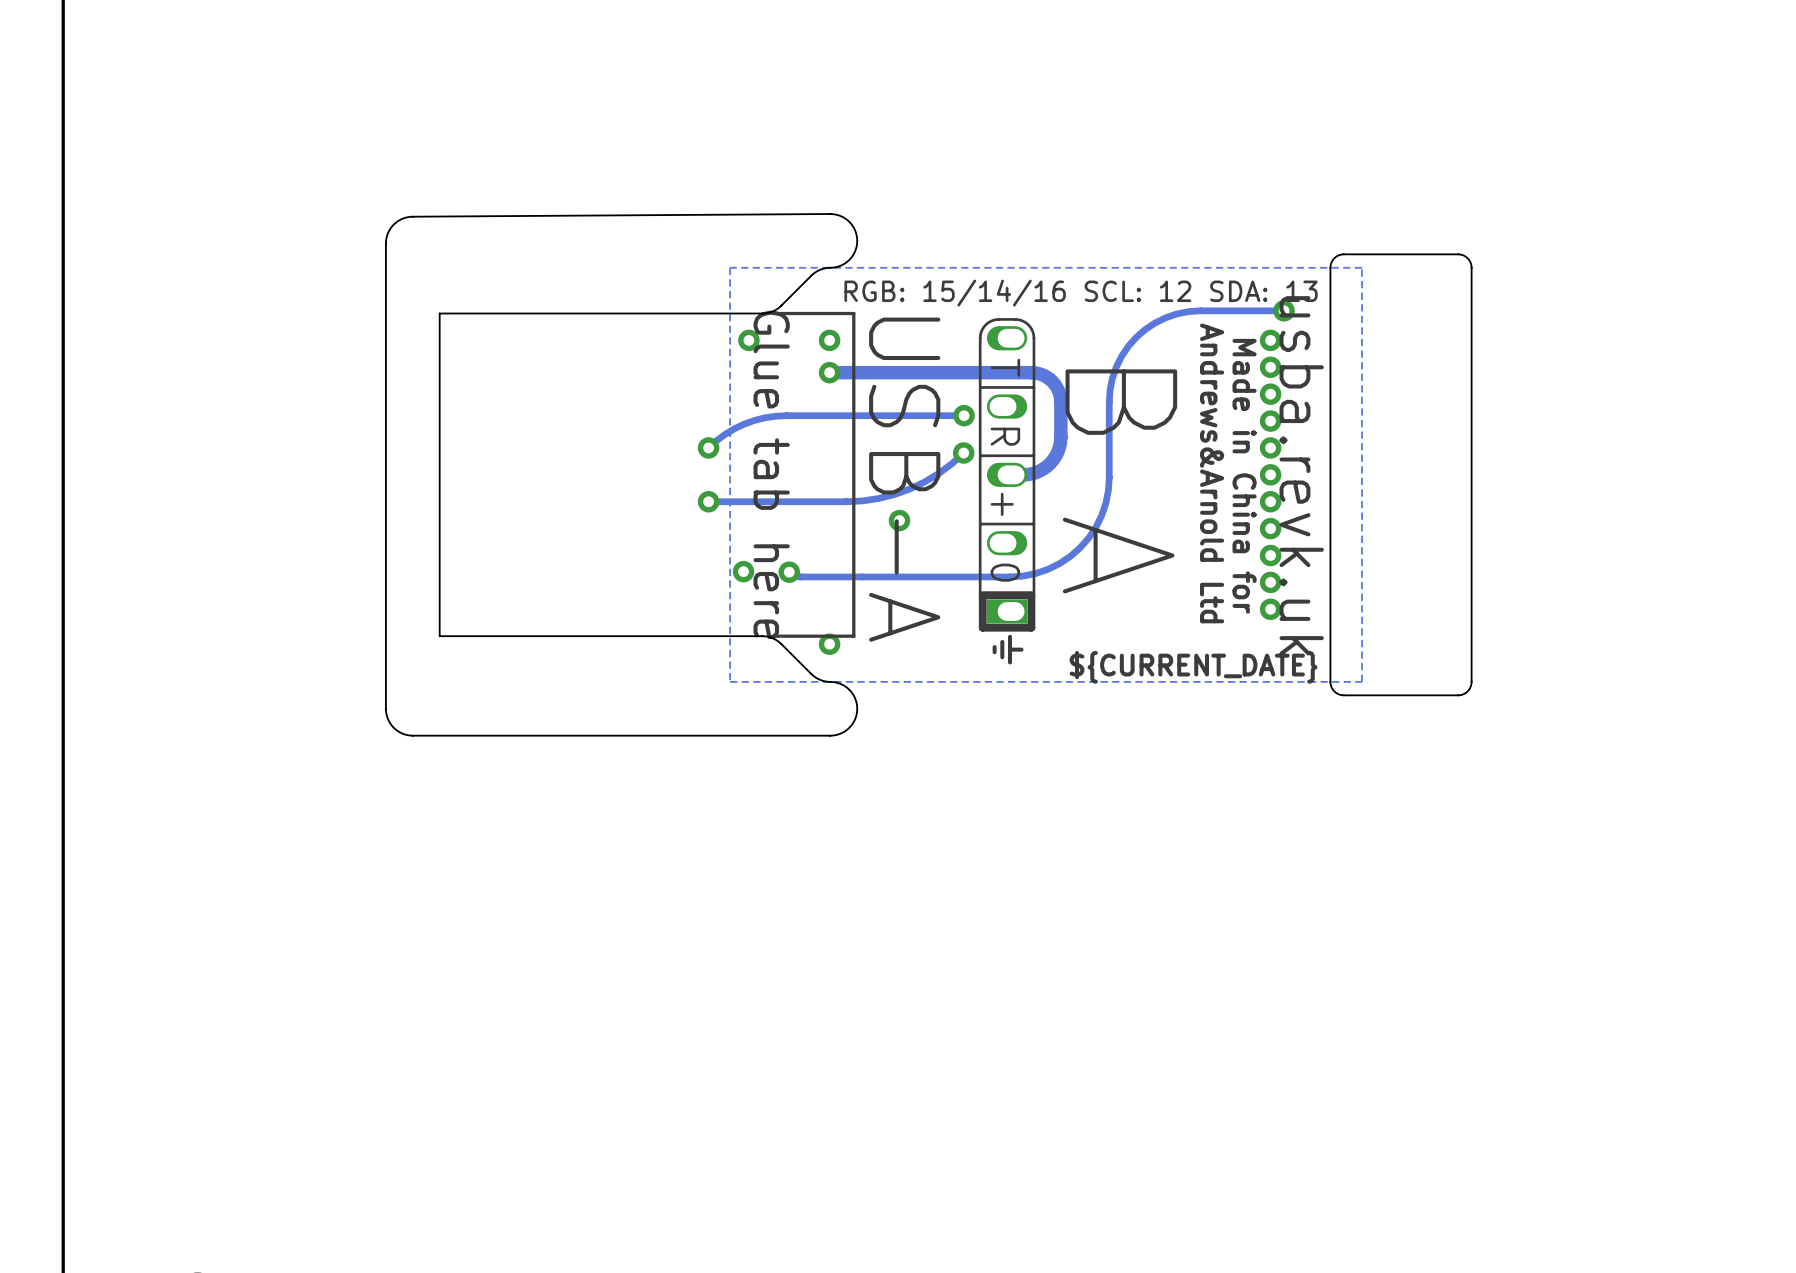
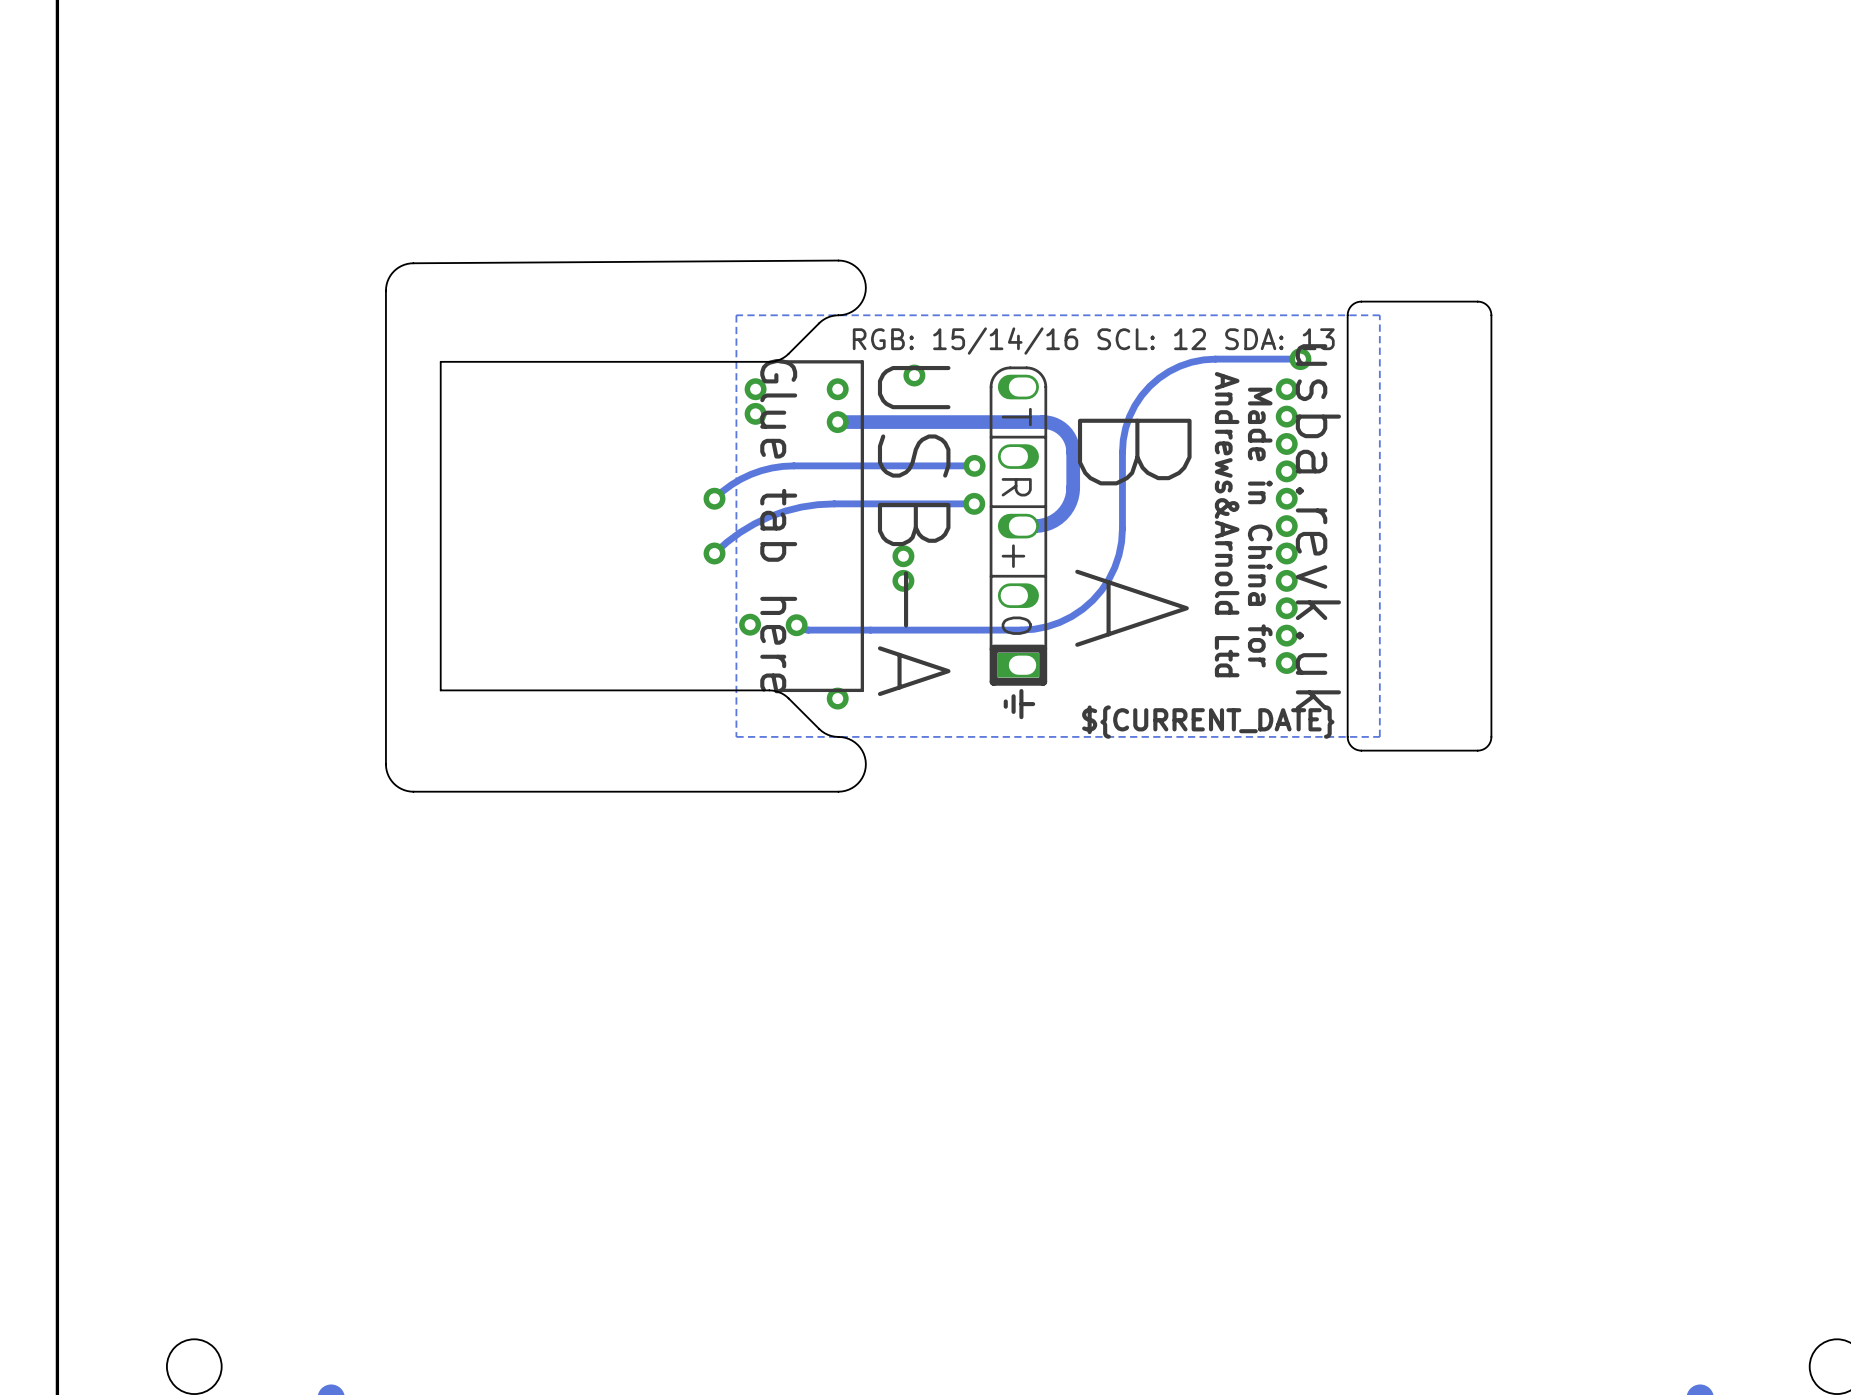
via: none -> (914, 375)
via: none -> (755, 413)
track: (963, 452) (951, 463) (924, 482) (894, 494) (878, 498) (846, 501) (708, 501) -> (974, 503) (834, 503) (801, 507) (785, 511) (754, 523) (740, 532) (714, 553)
via: none -> (903, 556)
via: (899, 520) -> none
via: none -> (903, 580)

